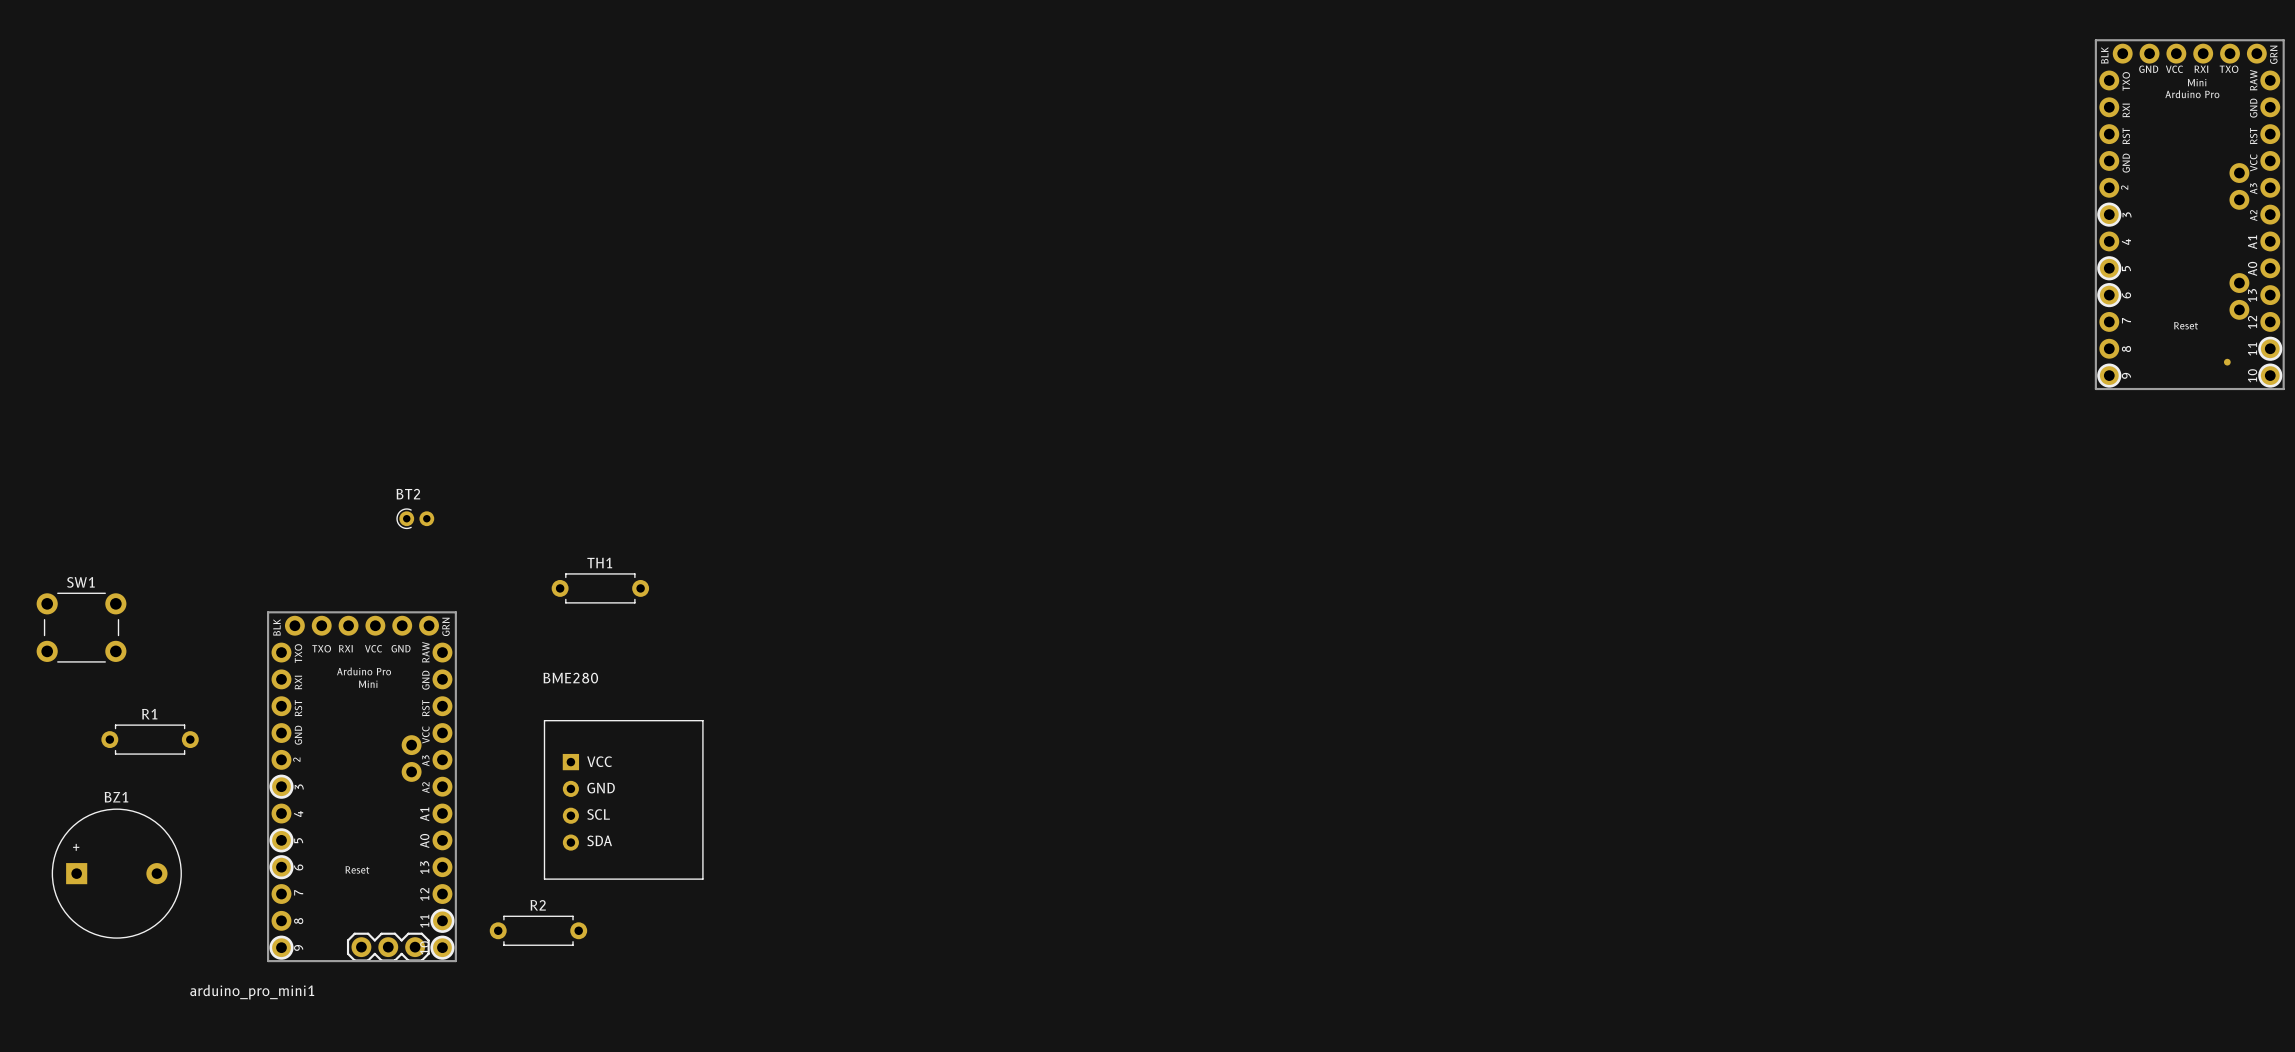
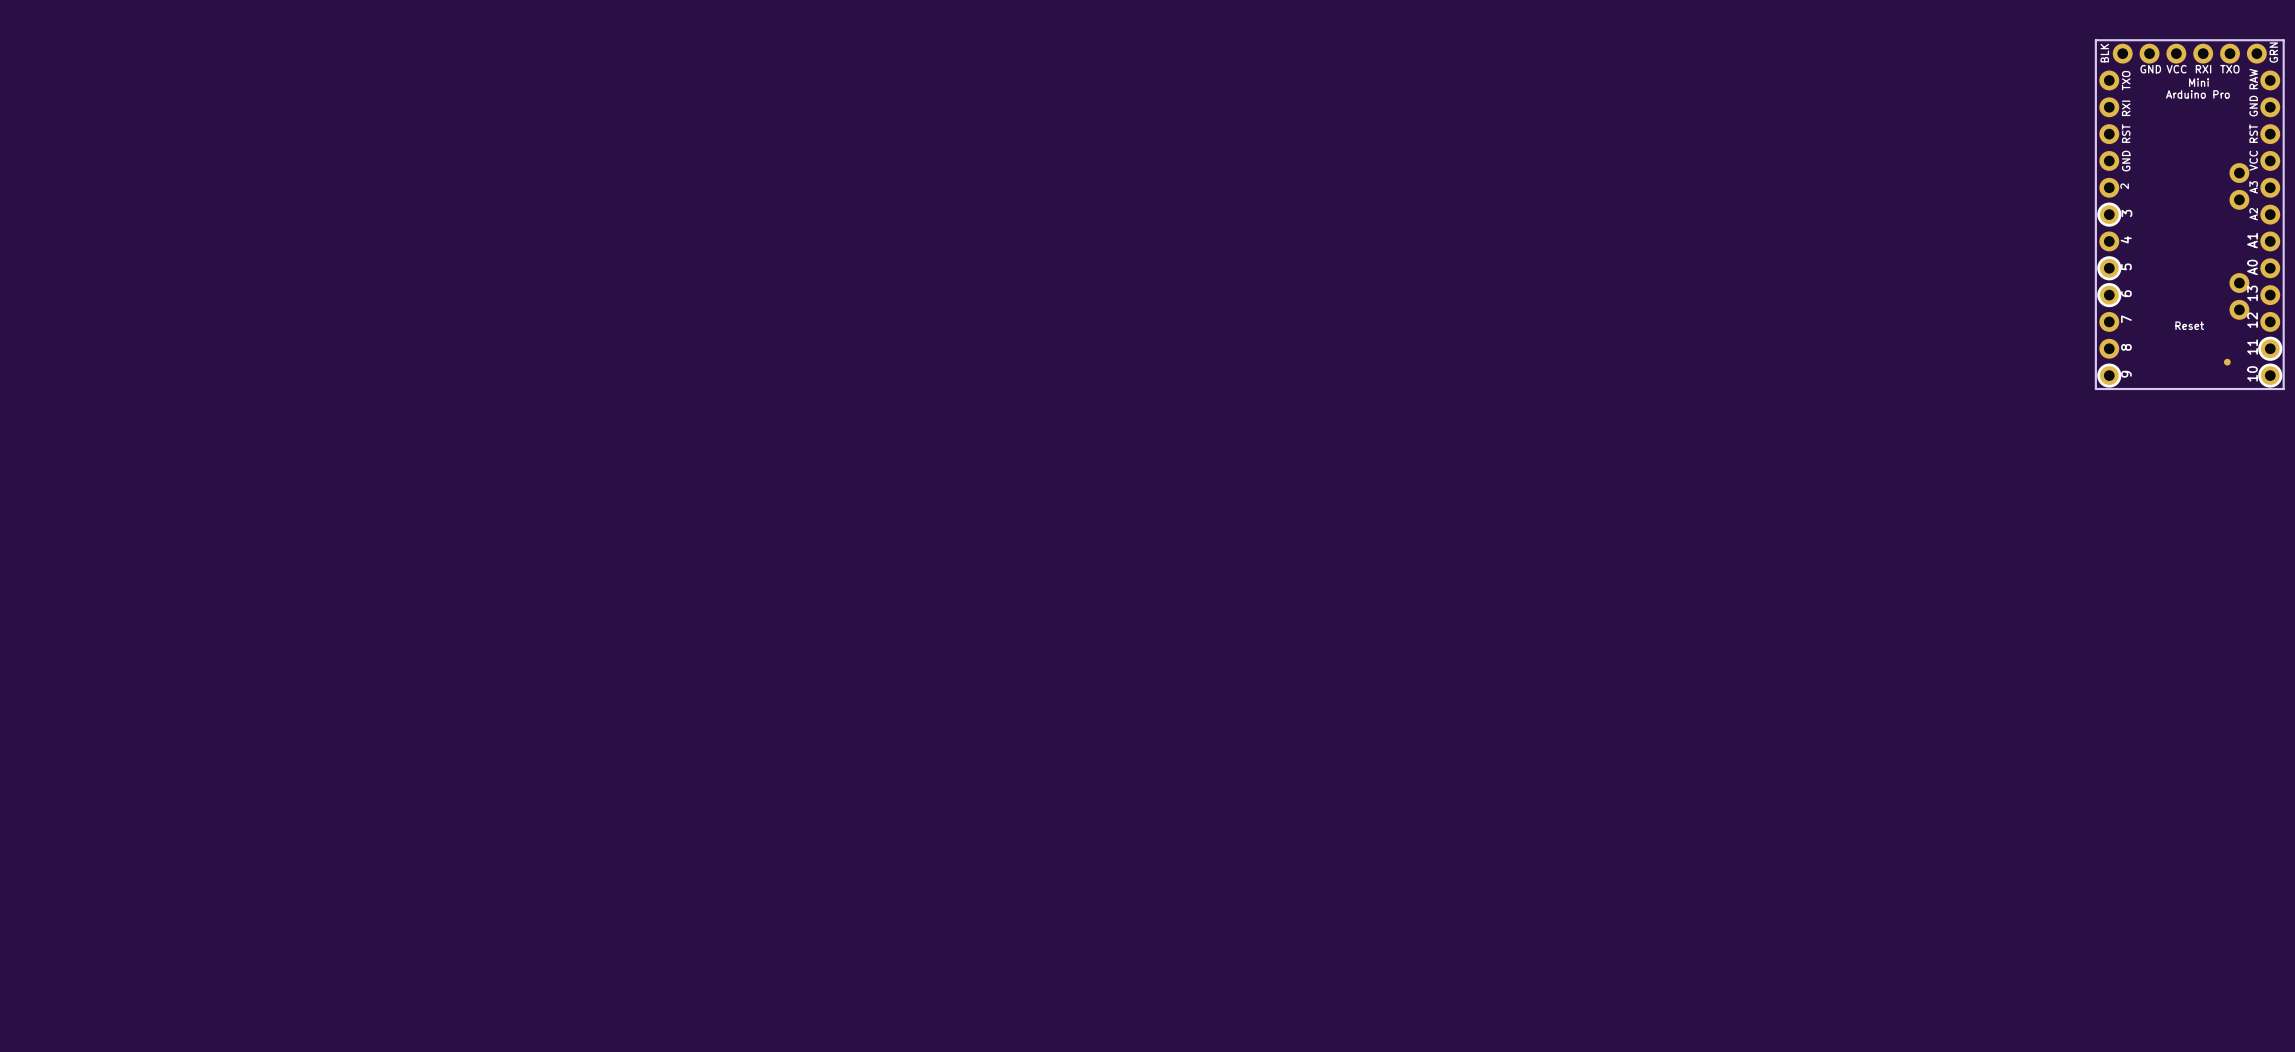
BT2: (415, 518) -> none
TH1: (600, 588) -> none
SW1: (81, 627) -> none
R1: (150, 739) -> none
arduino_pro_mini1: (361, 786) -> none
BME280: (623, 799) -> none
BZ1: (116, 873) -> none
R2: (538, 930) -> none

